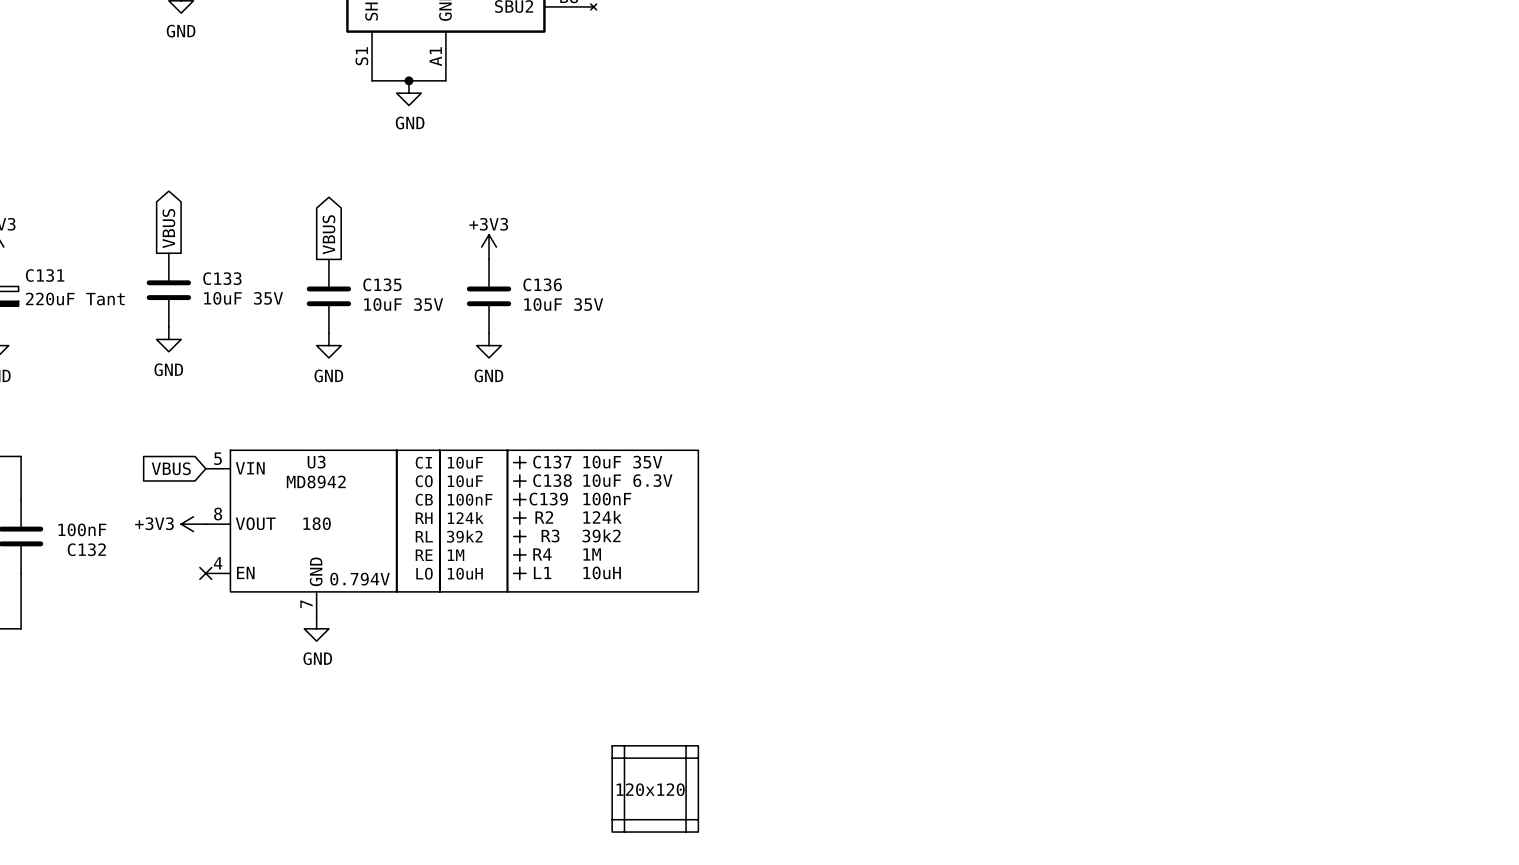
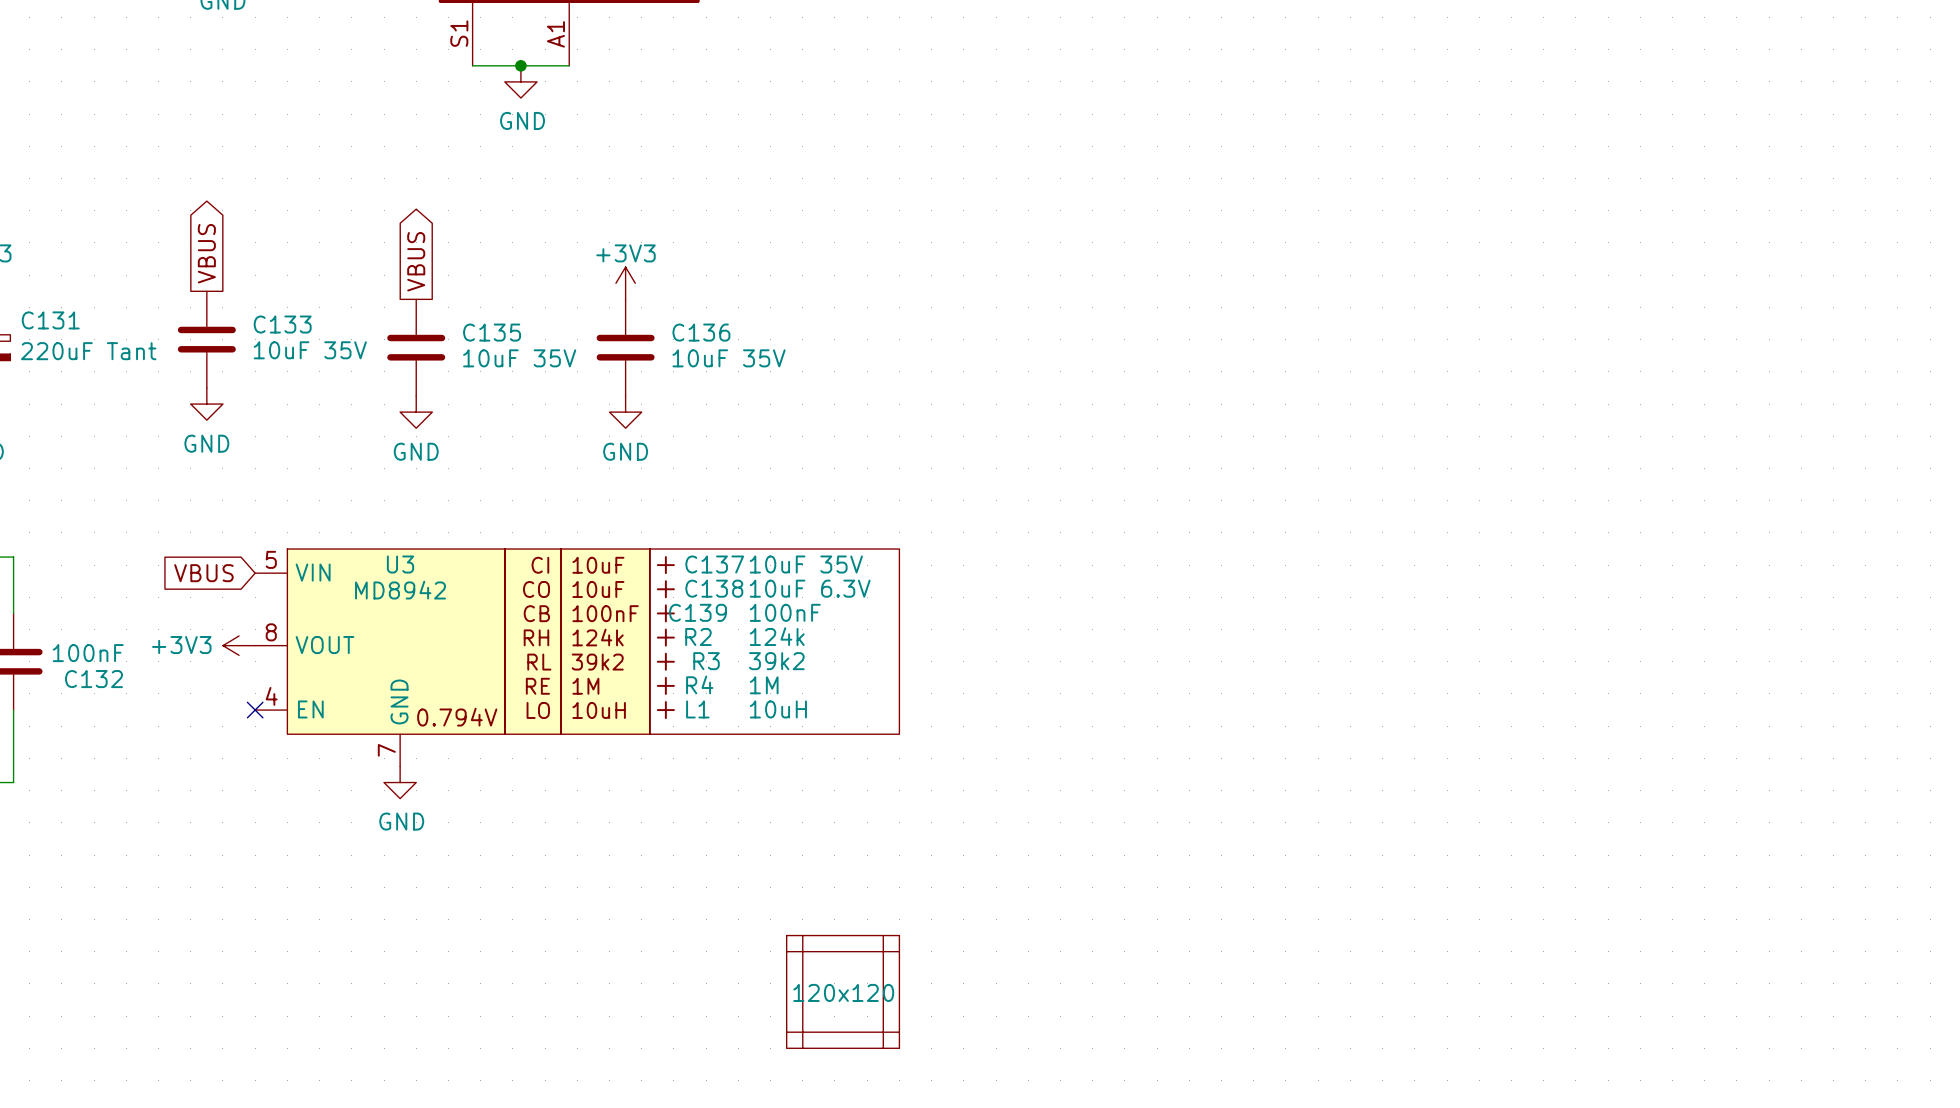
U3 text: 180 (317, 523) -> none

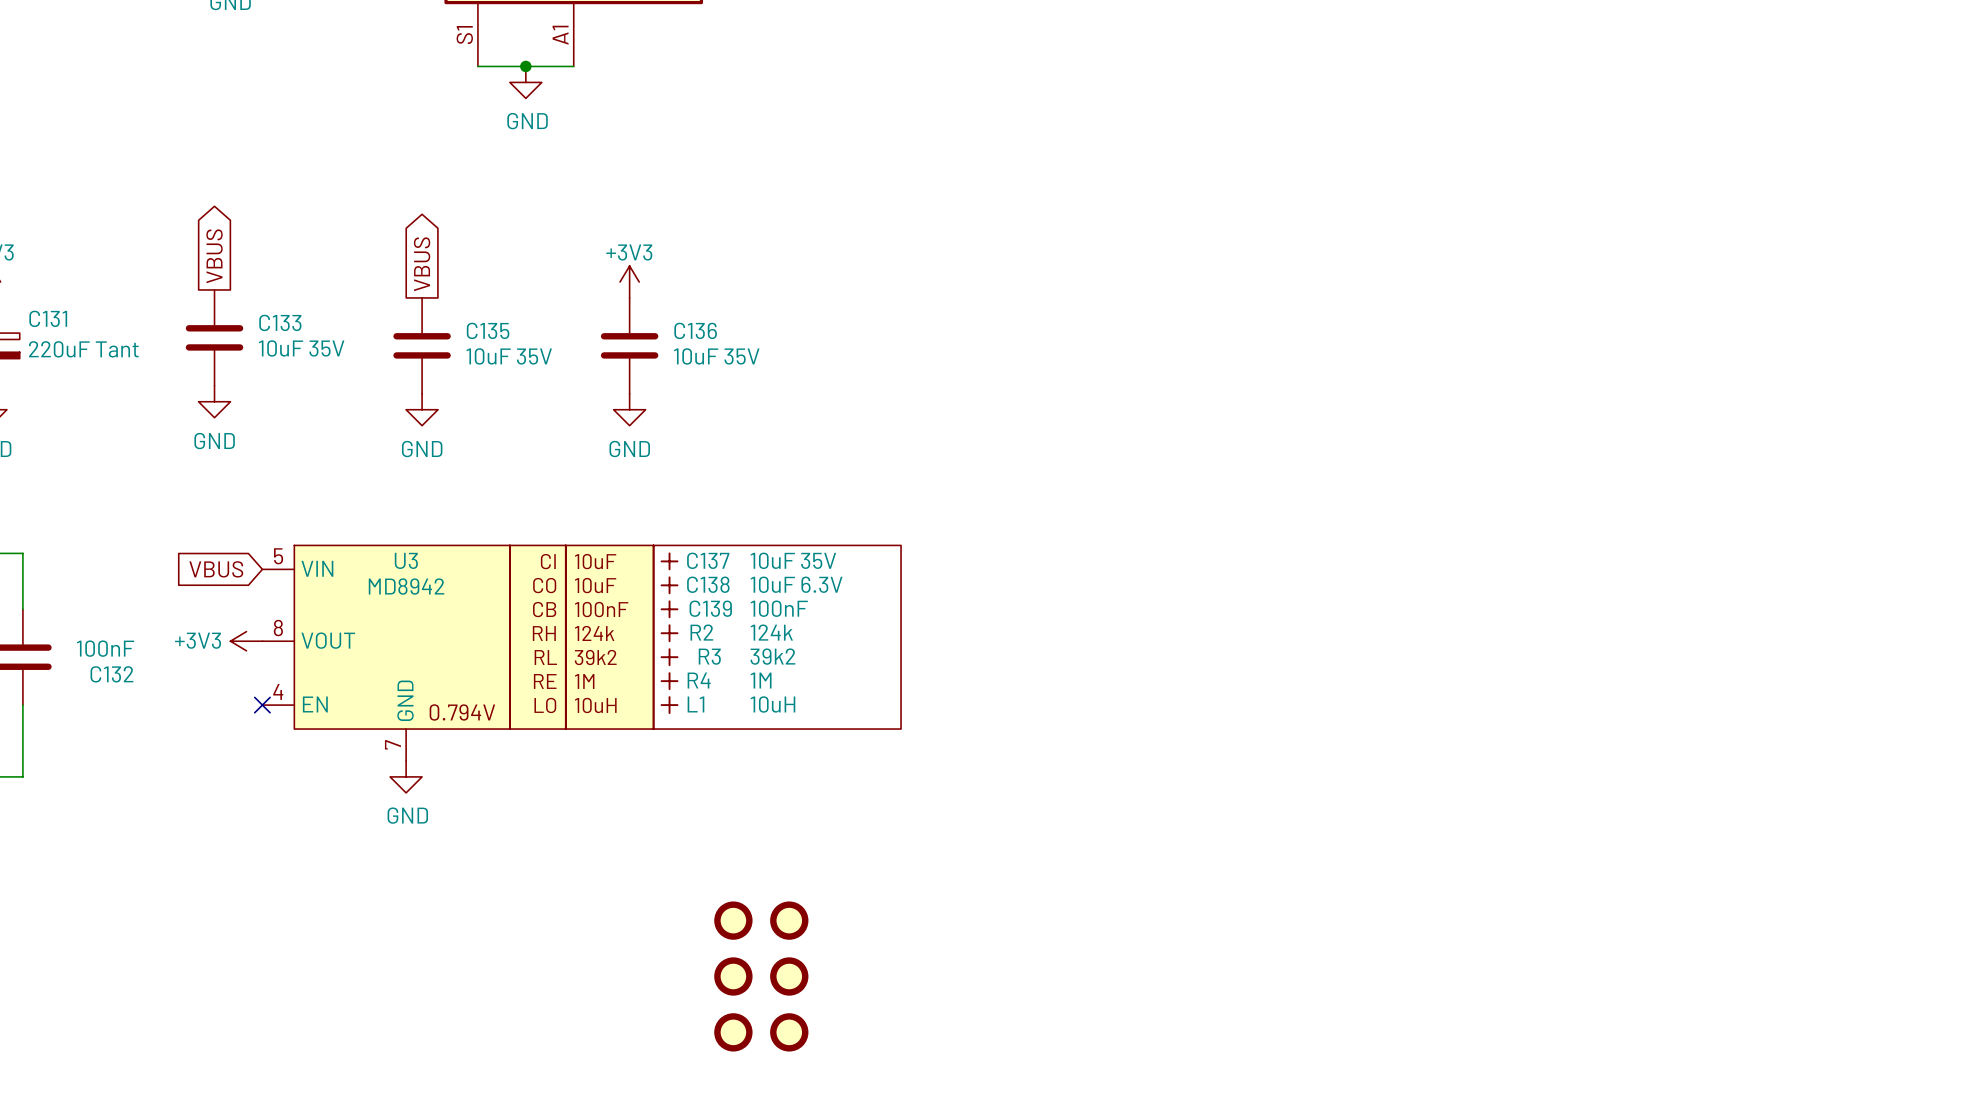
part: none -> (733, 920)
part: none -> (789, 920)
part: (843, 951) -> none
part: none -> (733, 976)
part: none -> (789, 976)
part: (802, 991) -> none
part: 120x120 (843, 991) -> none
part: (883, 991) -> none
part: (843, 1032) -> none
part: none -> (733, 1032)
part: none -> (789, 1032)

